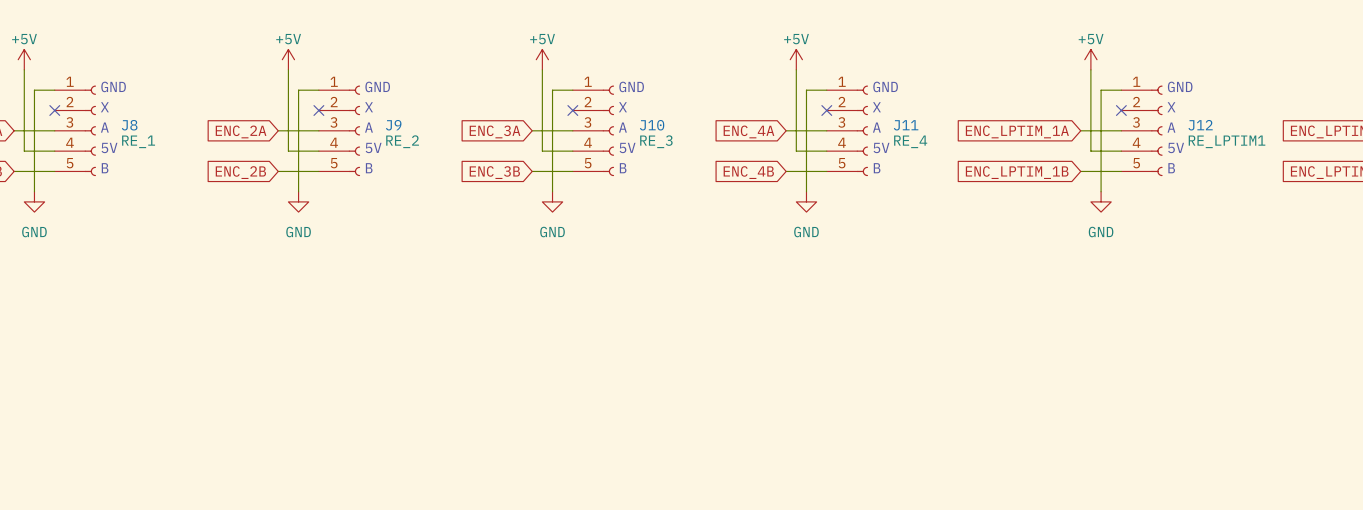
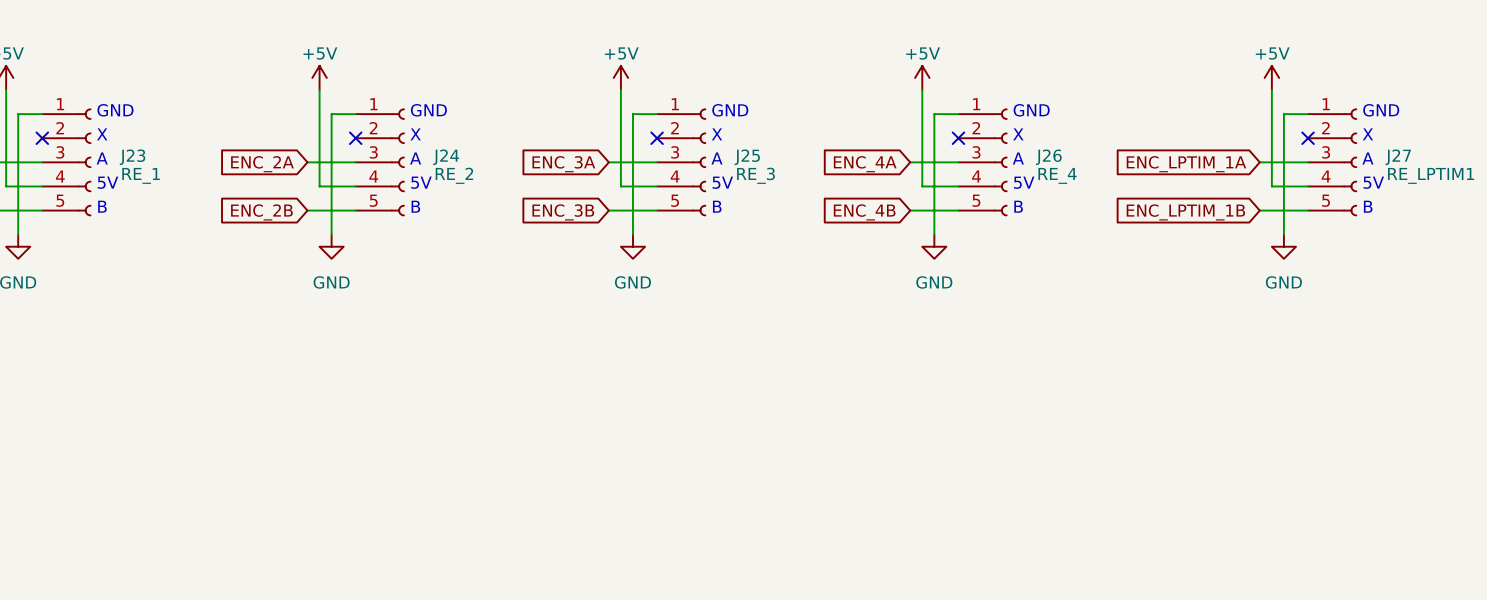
J8 name: J8 (129, 125) -> J23 (132, 157)
J9 name: J9 (393, 125) -> J24 (446, 157)
J10 name: J10 (652, 125) -> J25 (747, 157)
J11 name: J11 (906, 125) -> J26 (1048, 157)
J12 name: J12 (1200, 125) -> J27 (1398, 157)

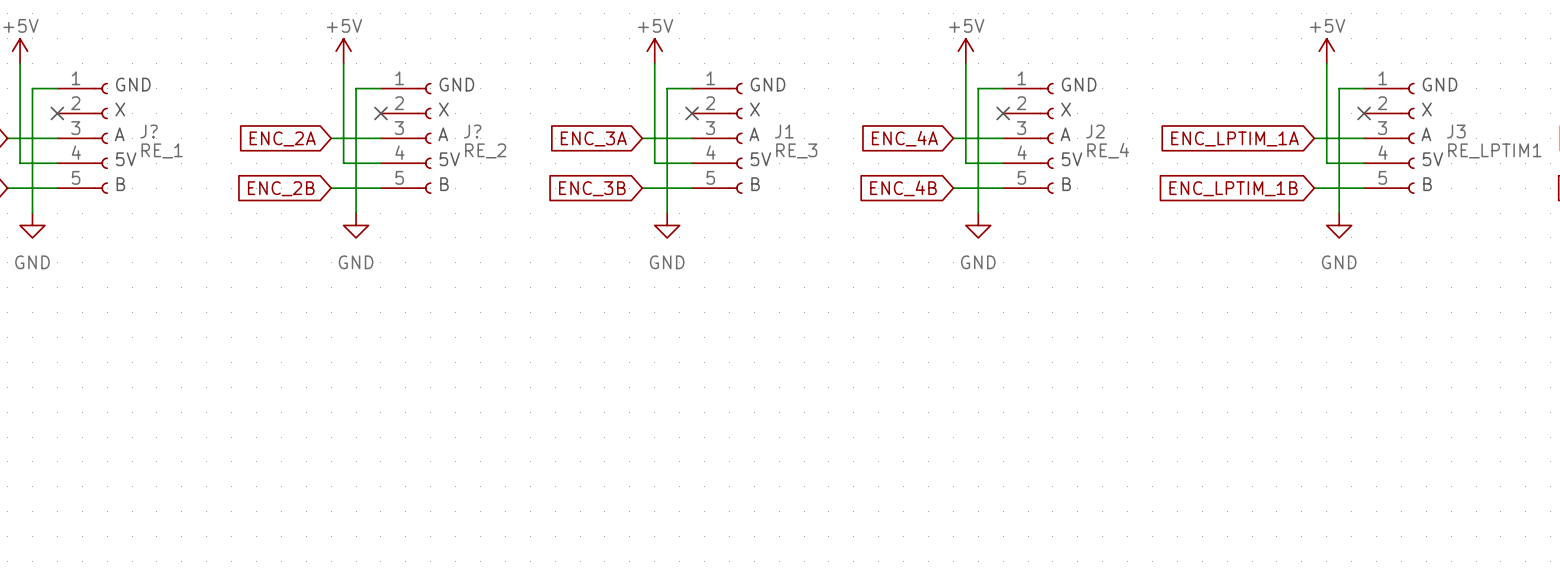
J23 name: J23 (132, 157) -> J? (149, 131)
J24 name: J24 (446, 157) -> J? (472, 131)
J25 name: J25 (747, 157) -> J1 (784, 131)
J26 name: J26 (1048, 157) -> J2 (1095, 131)
J27 name: J27 (1398, 157) -> J3 (1456, 131)

